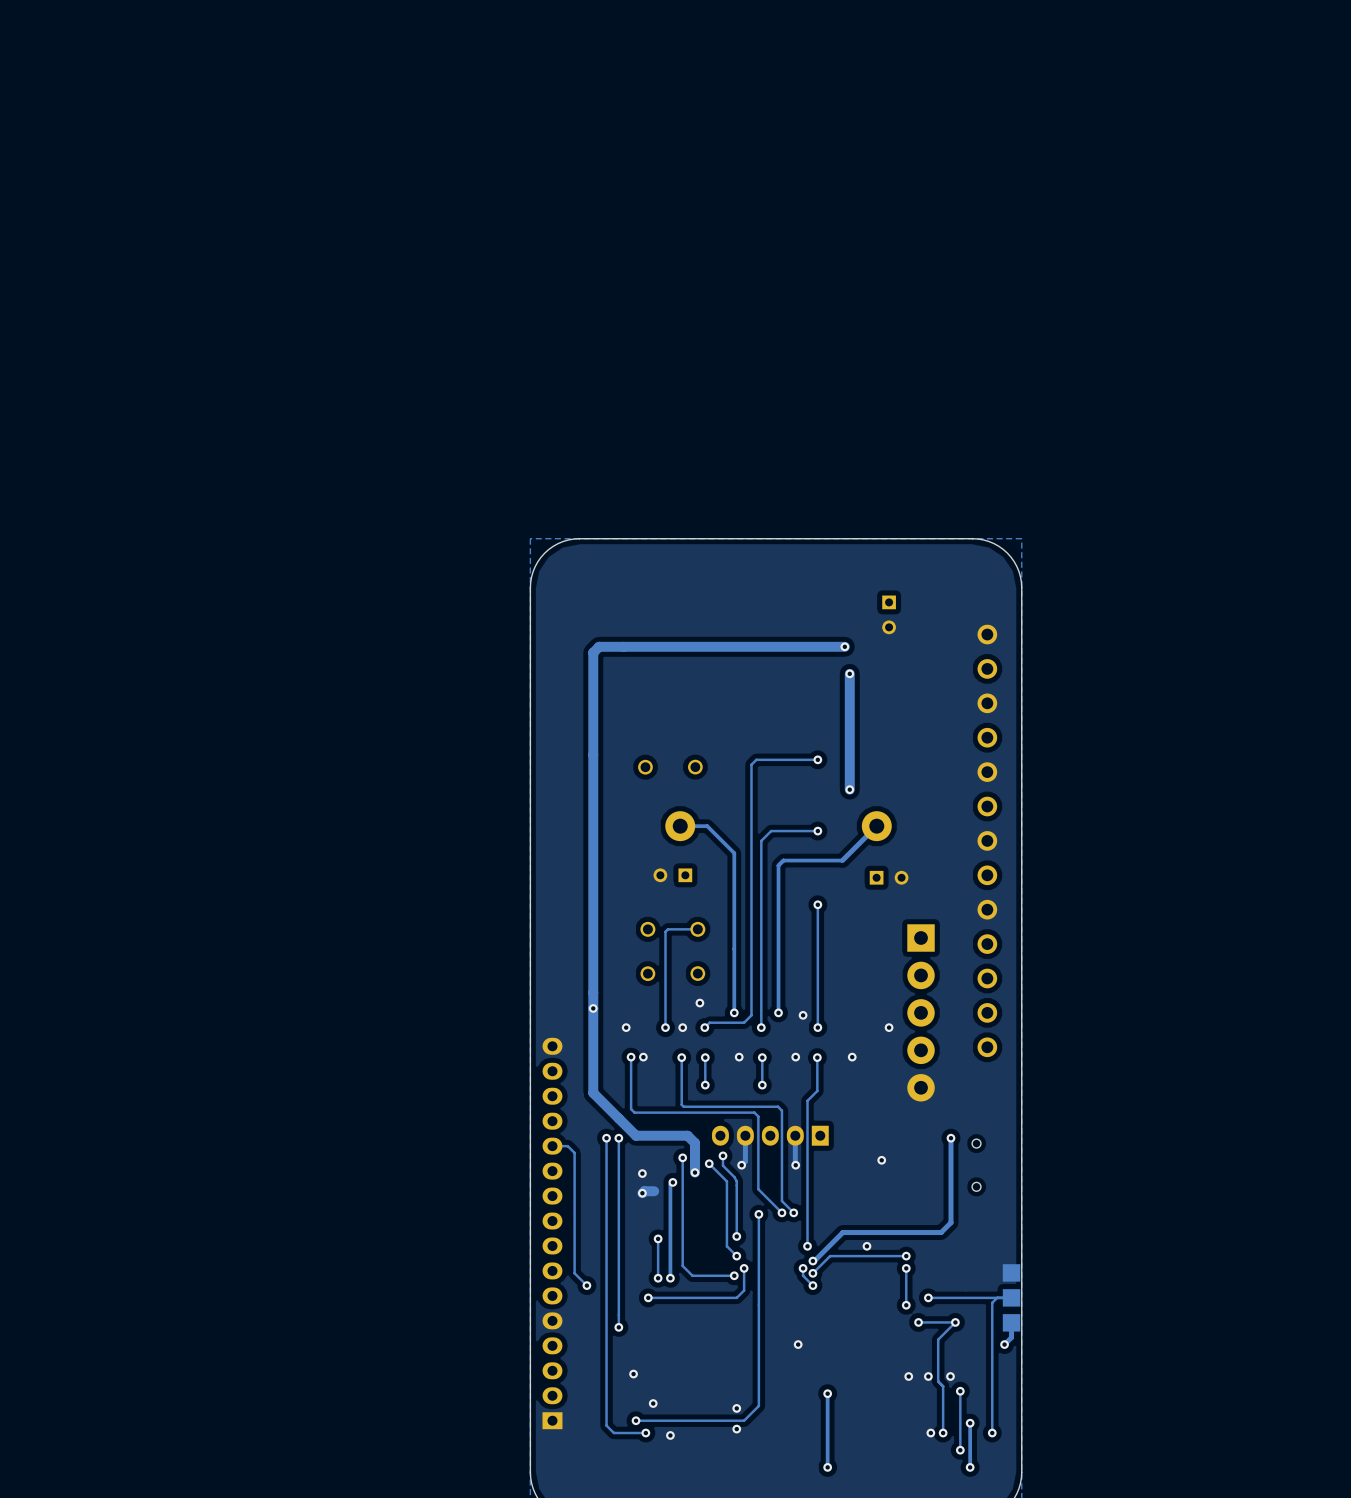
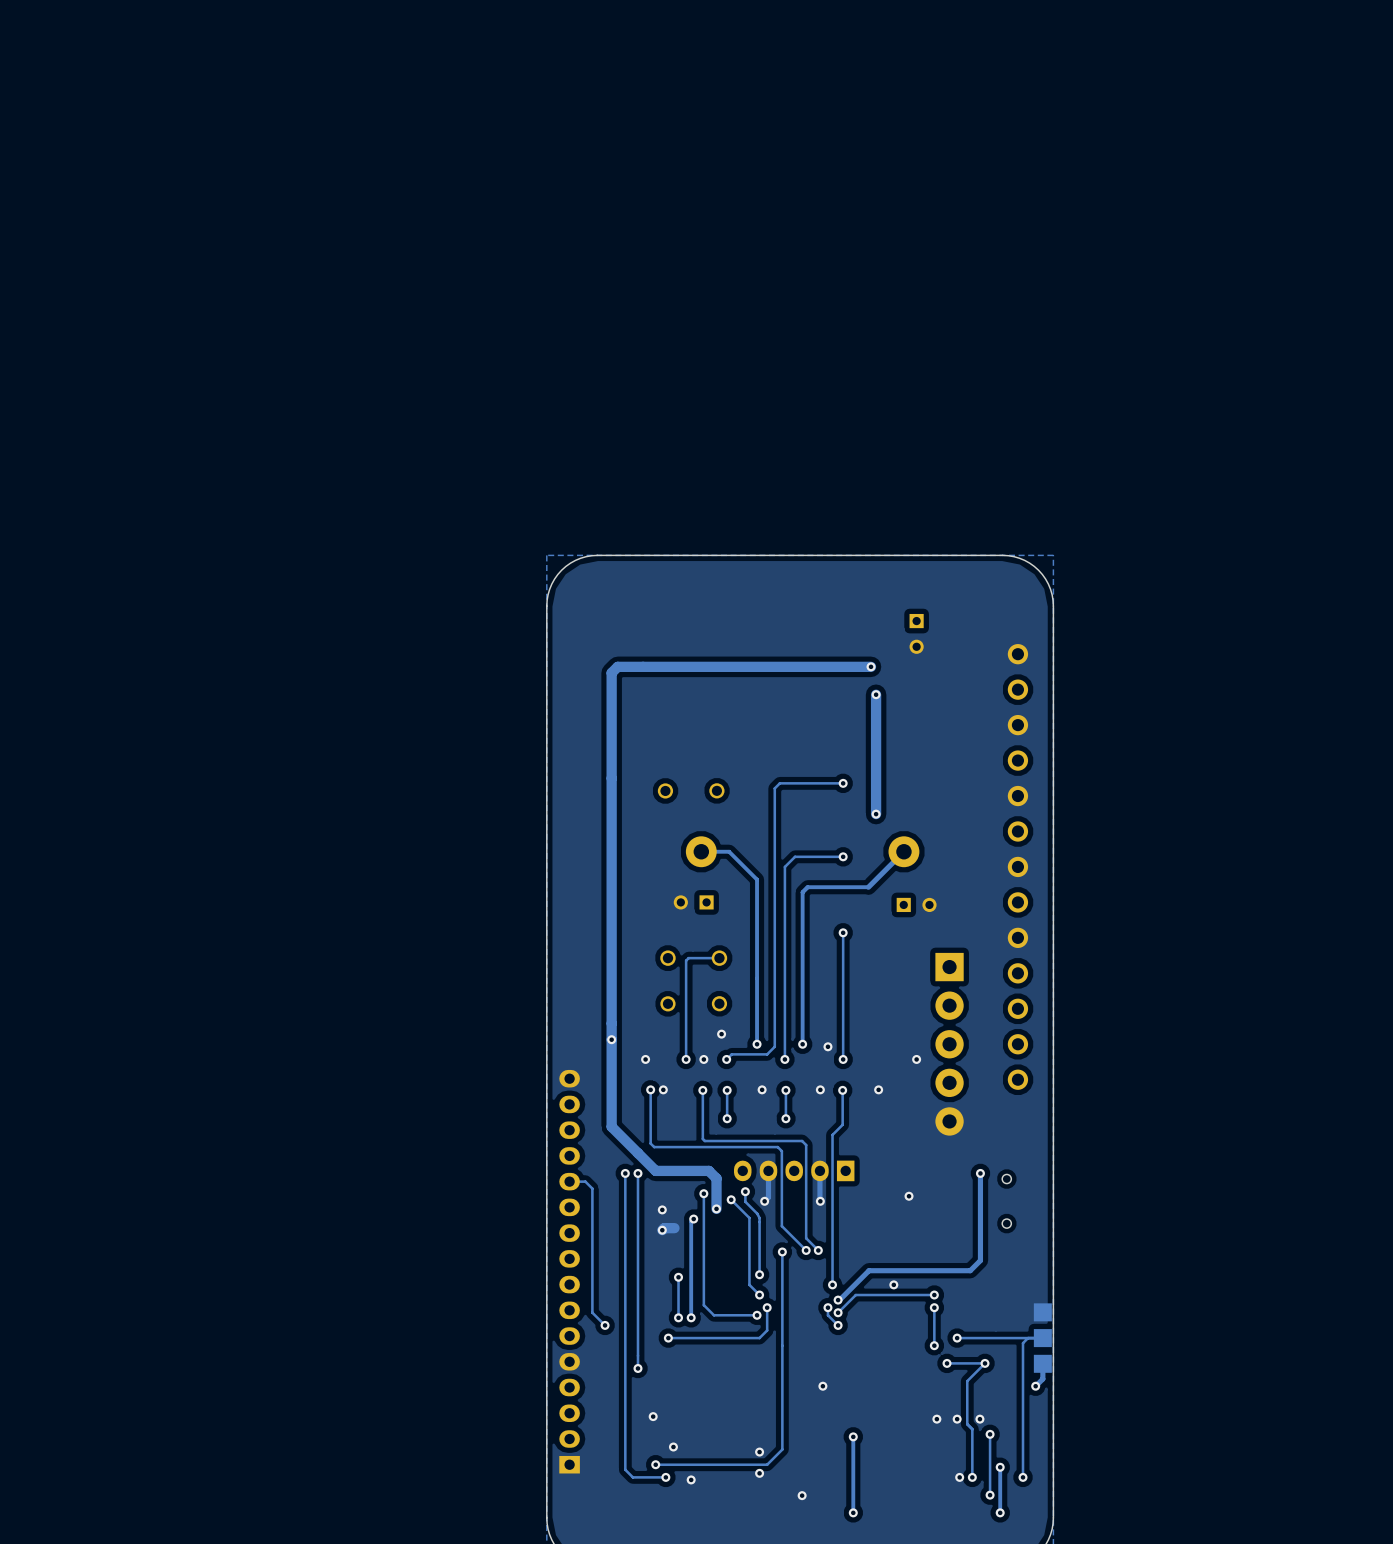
via: none -> (802, 1495)

